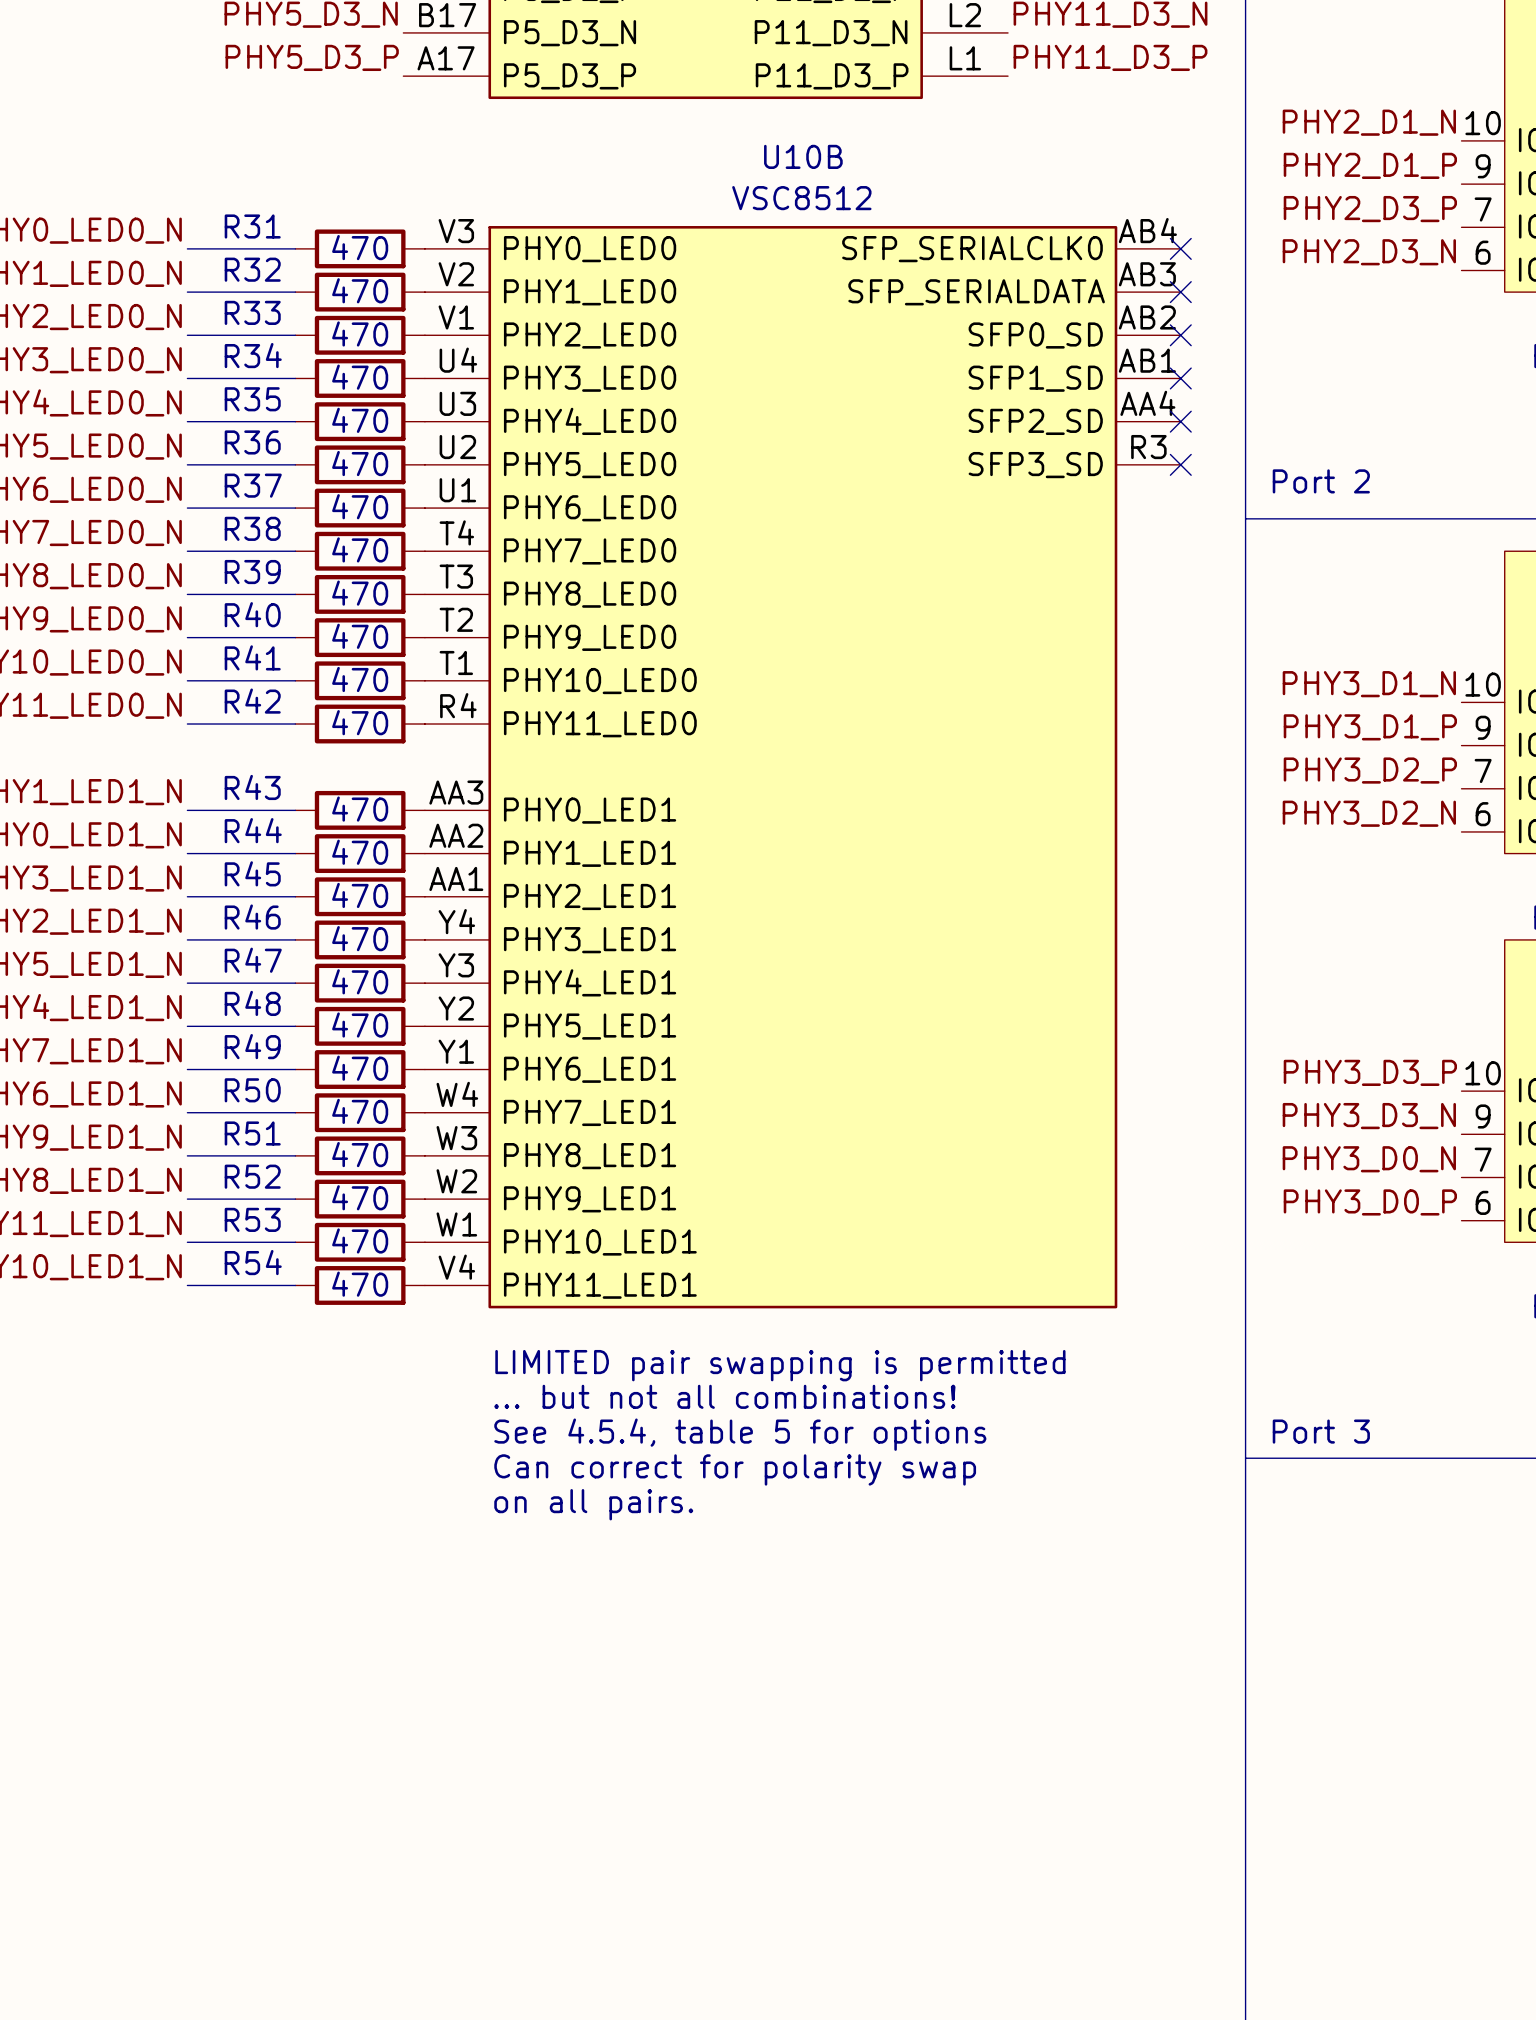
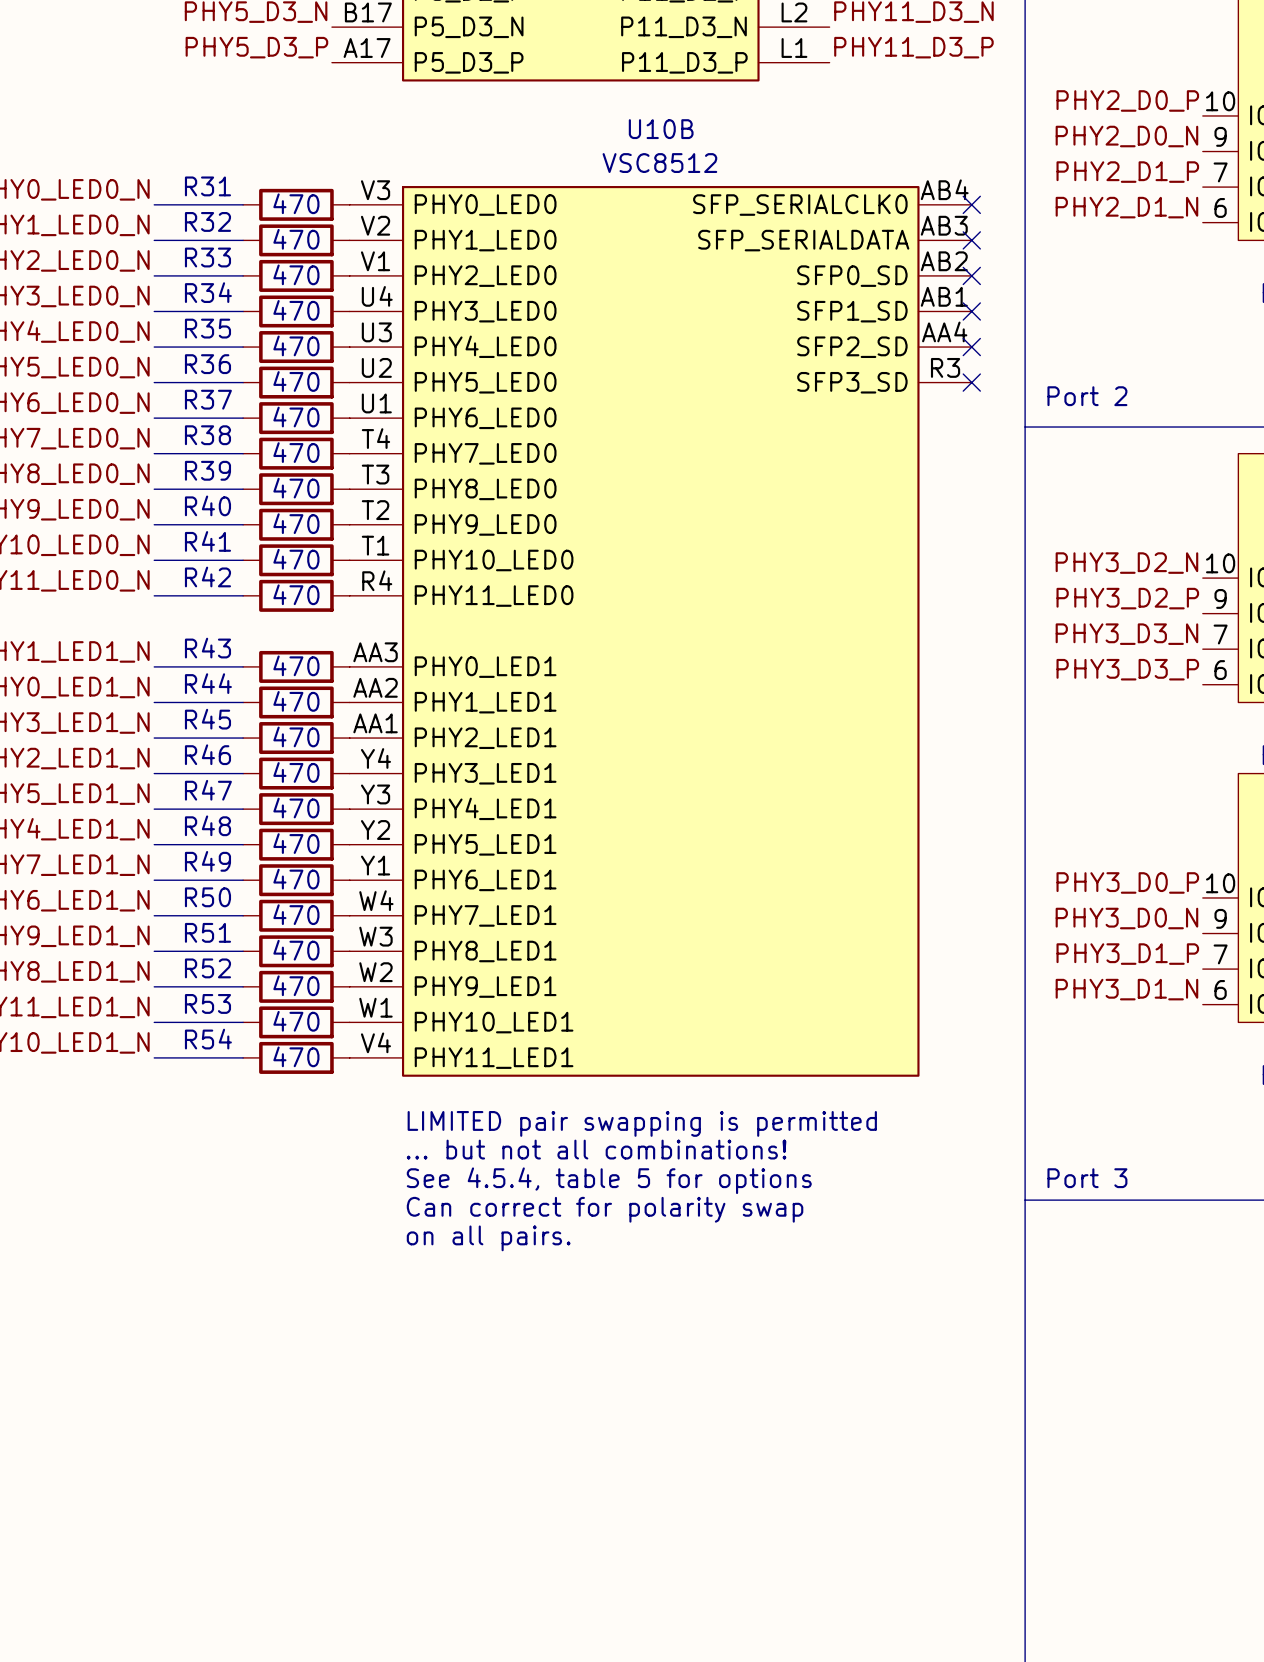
label: PHY2_D1_N (1369, 122) -> PHY2_D0_P (1127, 100)
label: PHY2_D1_P (1370, 165) -> PHY2_D0_N (1126, 136)
label: PHY2_D3_P (1370, 209) -> PHY2_D1_P (1127, 172)
label: PHY2_D3_N (1369, 252) -> PHY2_D1_N (1126, 207)
label: PHY3_D1_N (1369, 684) -> PHY3_D2_N (1126, 563)
label: PHY3_D1_P (1370, 727) -> PHY3_D2_P (1127, 598)
label: PHY3_D2_P (1370, 770) -> PHY3_D3_N (1126, 634)
label: PHY3_D2_N (1369, 813) -> PHY3_D3_P (1127, 669)
label: PHY3_D3_P (1370, 1072) -> PHY3_D0_P (1127, 882)
label: PHY3_D3_N (1369, 1116) -> PHY3_D0_N (1126, 918)
label: PHY3_D0_N (1369, 1159) -> PHY3_D1_P (1127, 954)
label: PHY3_D0_P (1370, 1202) -> PHY3_D1_N (1126, 989)

